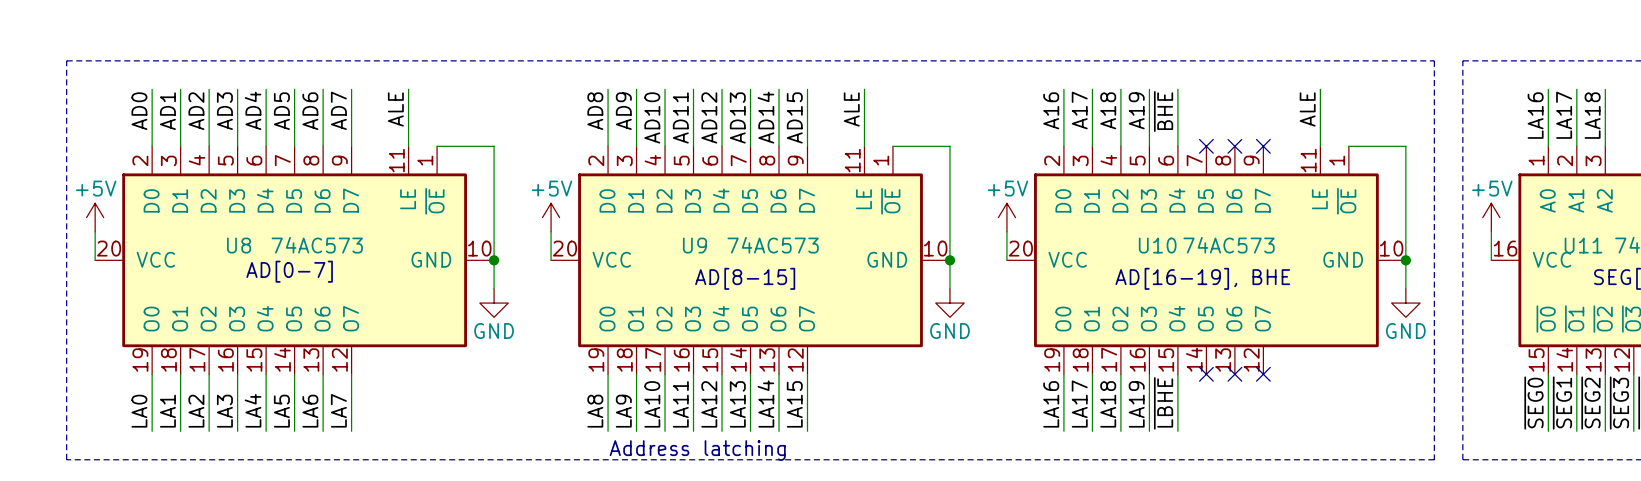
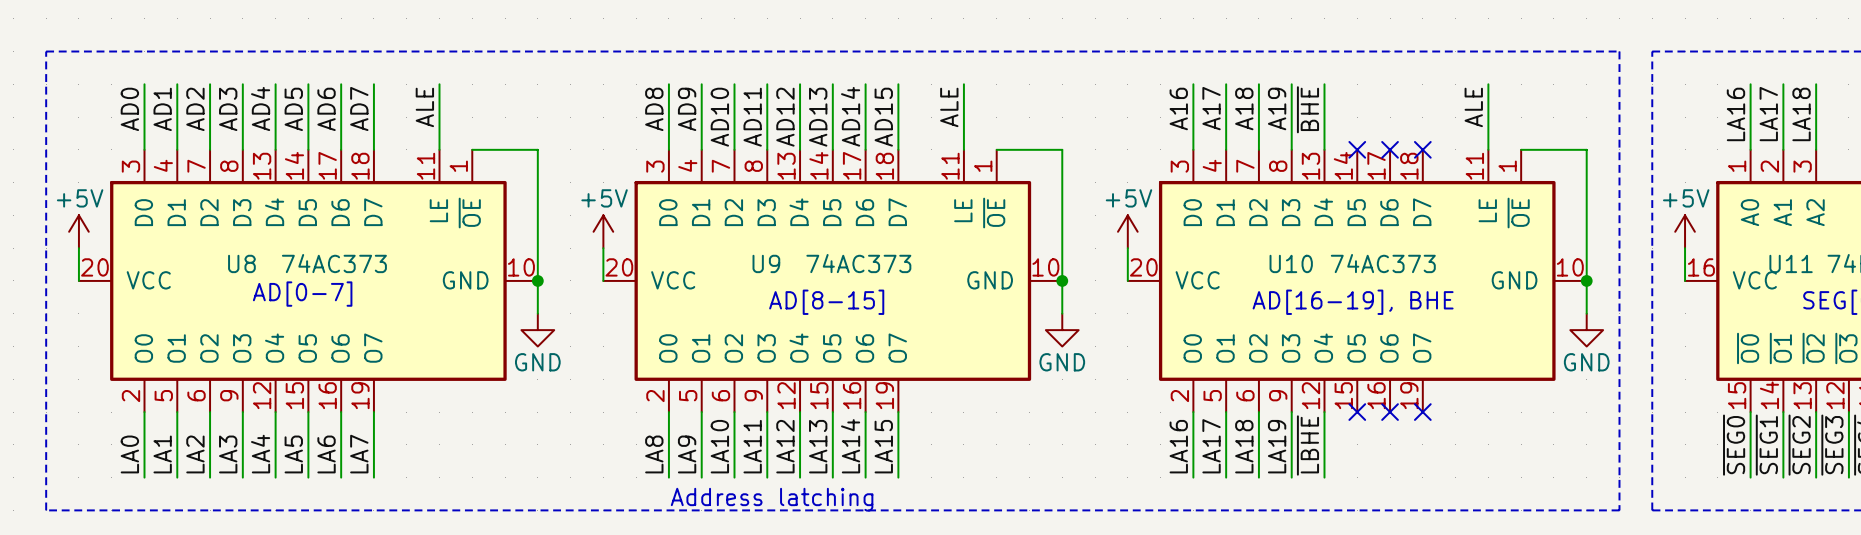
U8 symbol: [95, 146, 495, 375] -> [78, 149, 538, 413]
U9 symbol: [551, 146, 950, 375] -> [603, 149, 1063, 413]
U10 symbol: [1006, 146, 1406, 375] -> [1127, 149, 1587, 413]
U8 value: 74AC573 (317, 245) -> 74AC373 (334, 263)
U9 value: 74AC573 (773, 245) -> 74AC373 (858, 263)
U10 value: 74AC573 (1229, 245) -> 74AC373 (1383, 263)

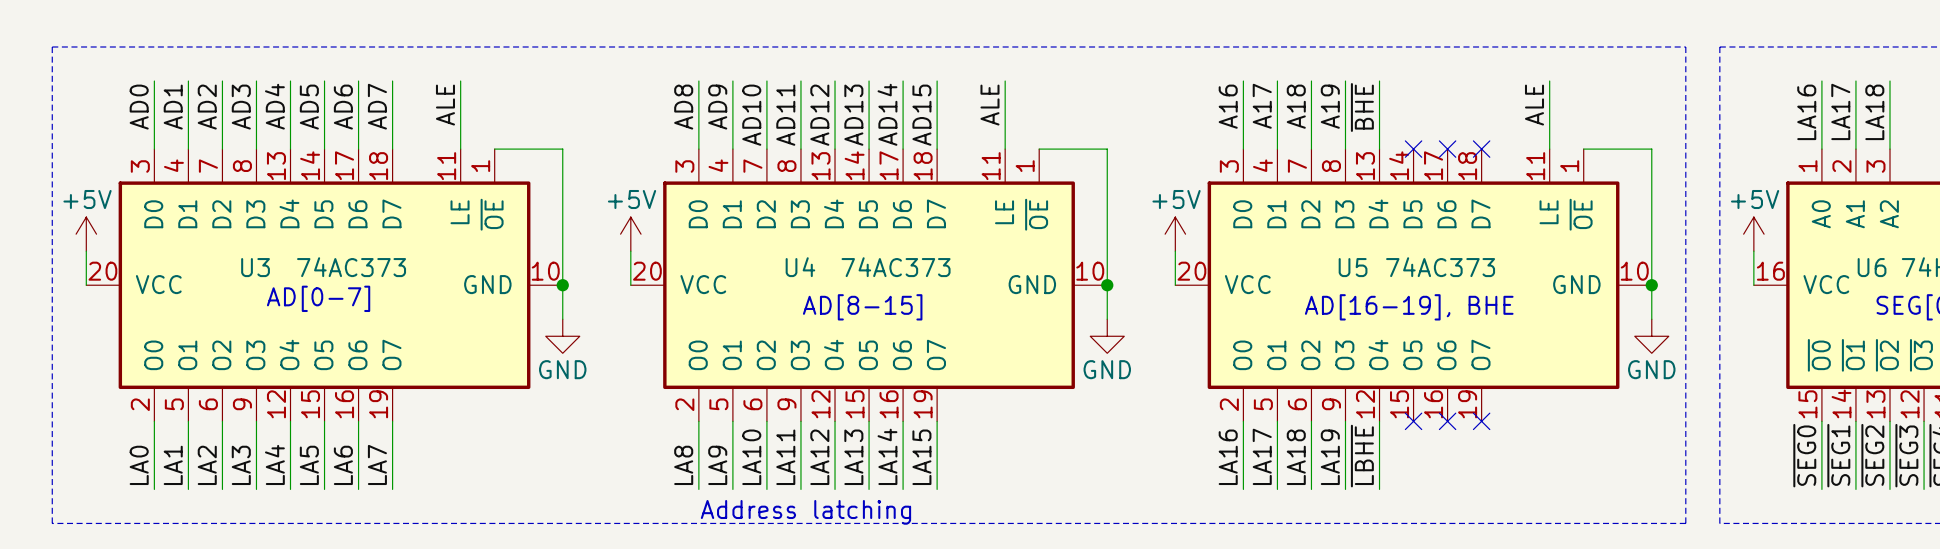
U8 name: U8 (241, 263) -> U3 (255, 267)
U9 name: U9 (766, 263) -> U4 (800, 267)
U10 name: U10 (1291, 263) -> U5 (1353, 267)
U11 name: U11 (1791, 263) -> U6 (1872, 267)

